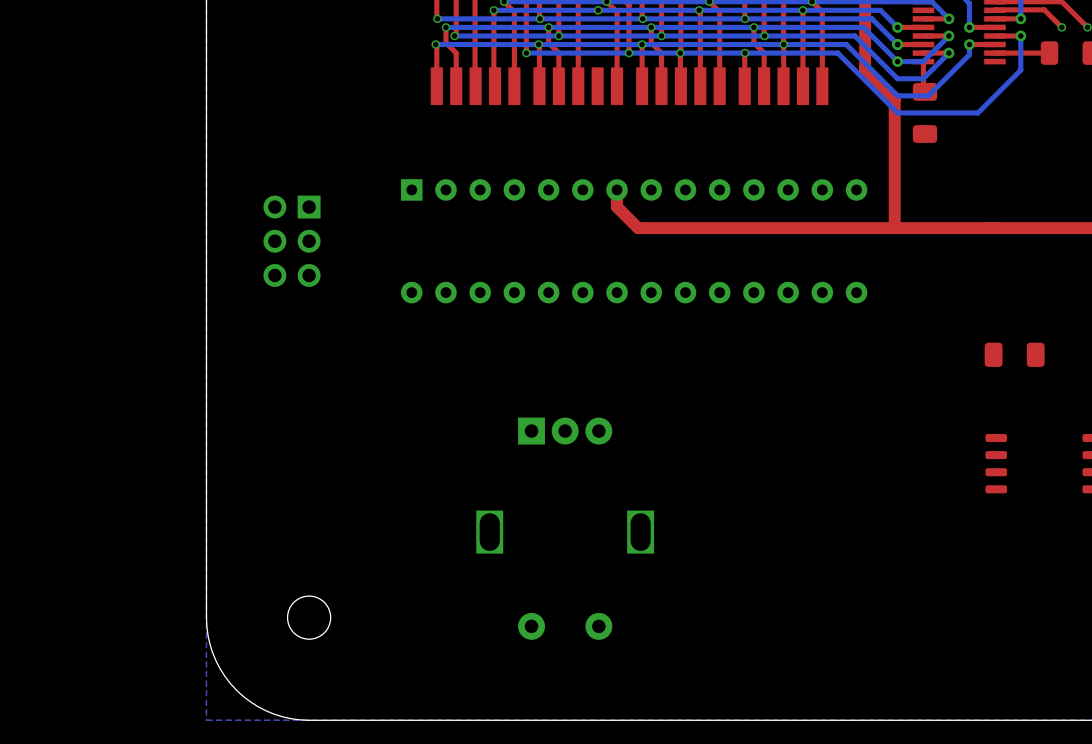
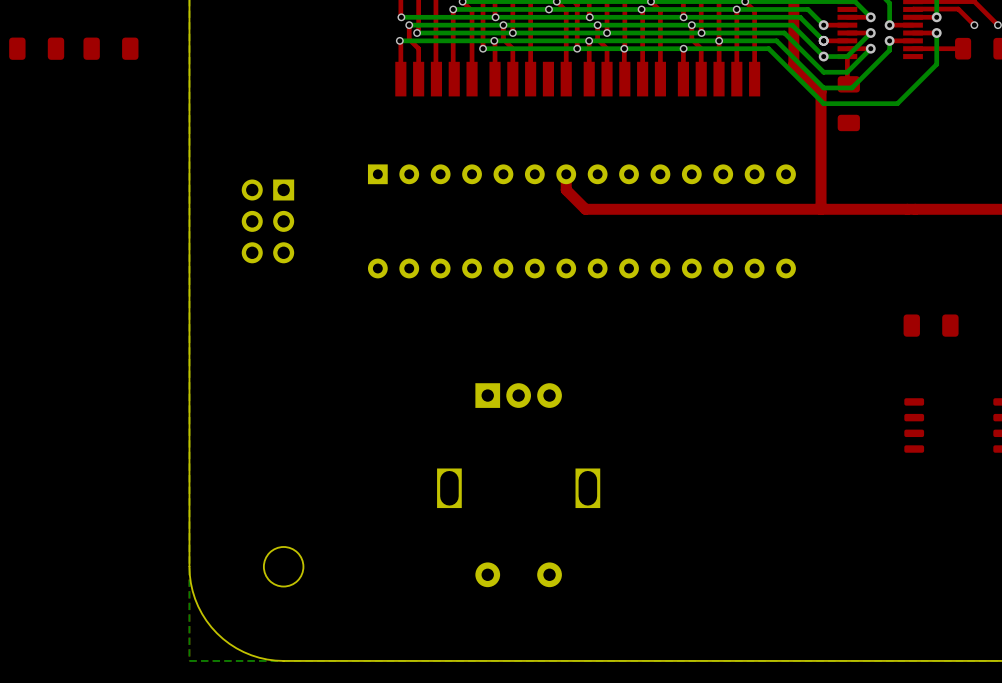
part: none -> (36, 48)
part: none -> (110, 48)

